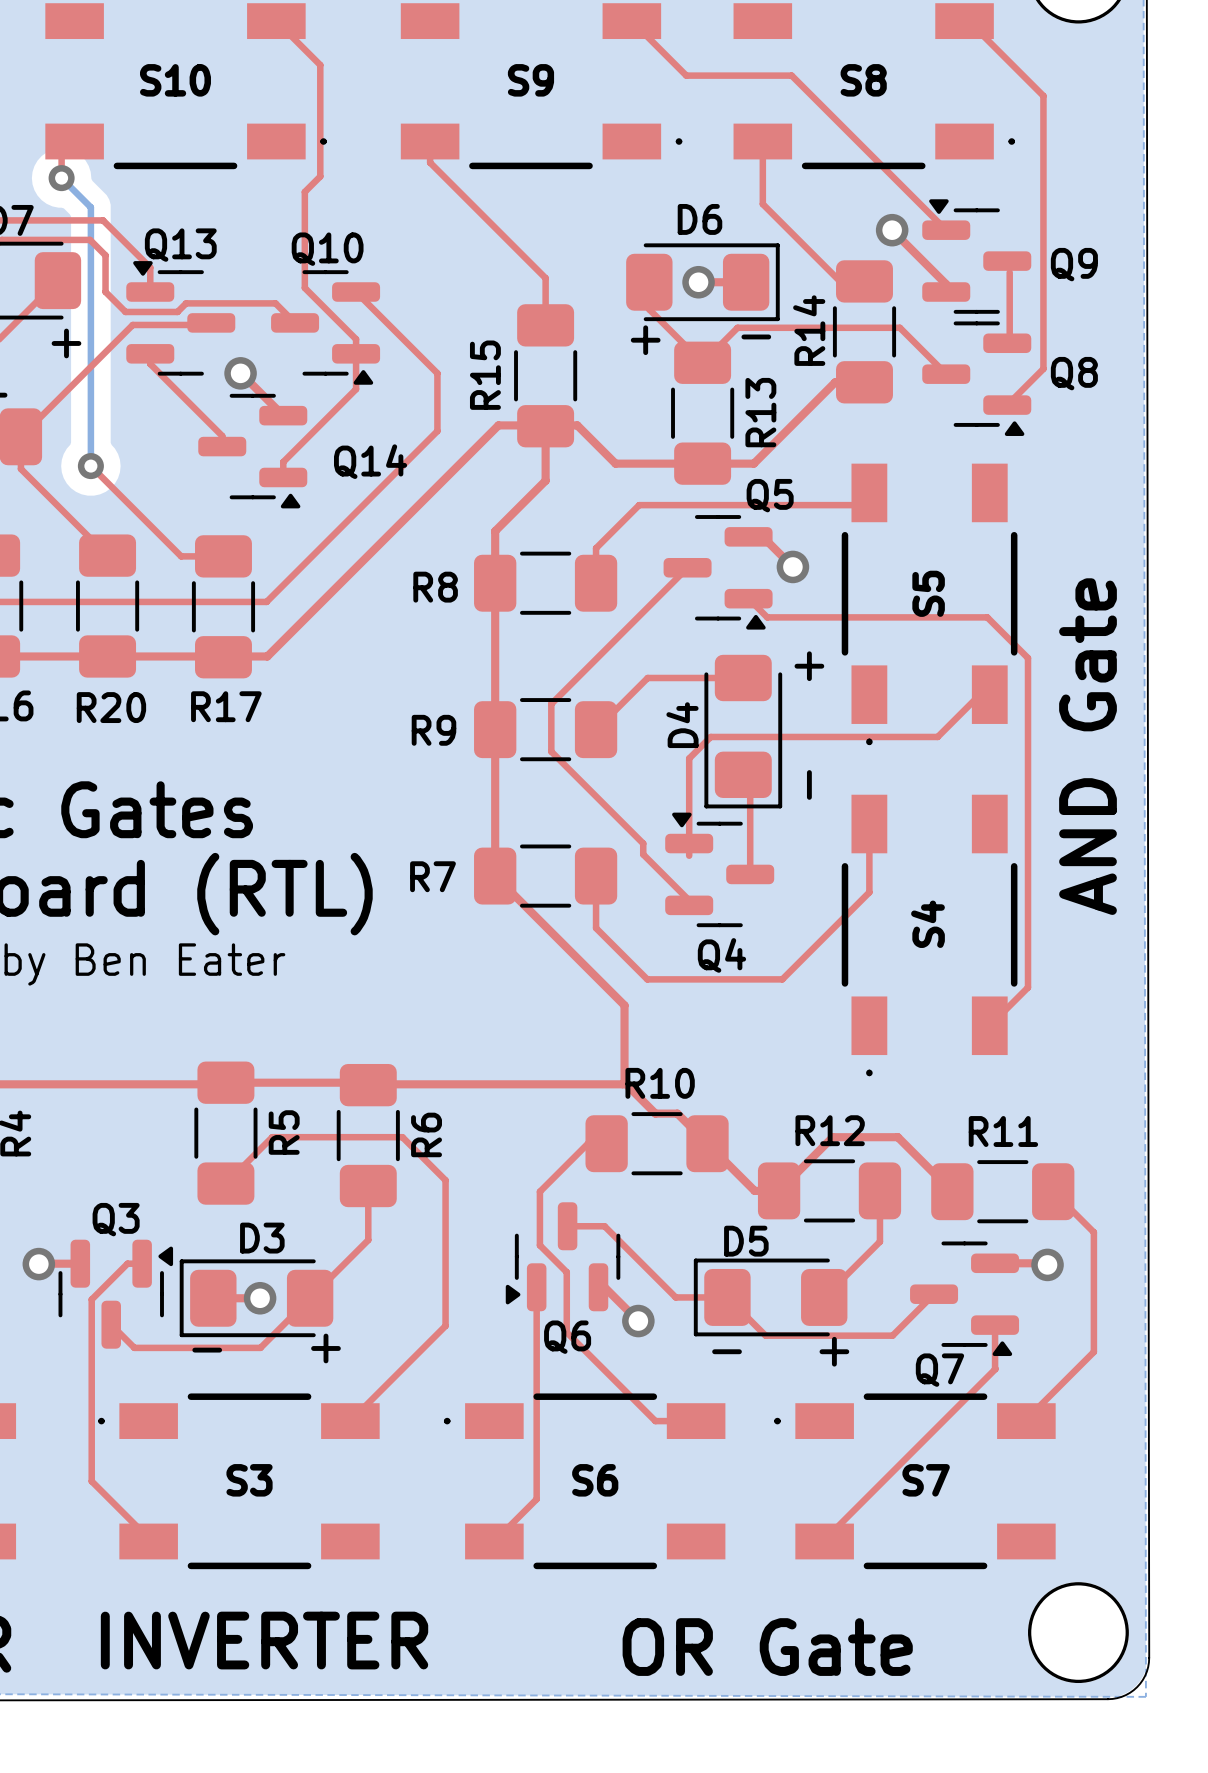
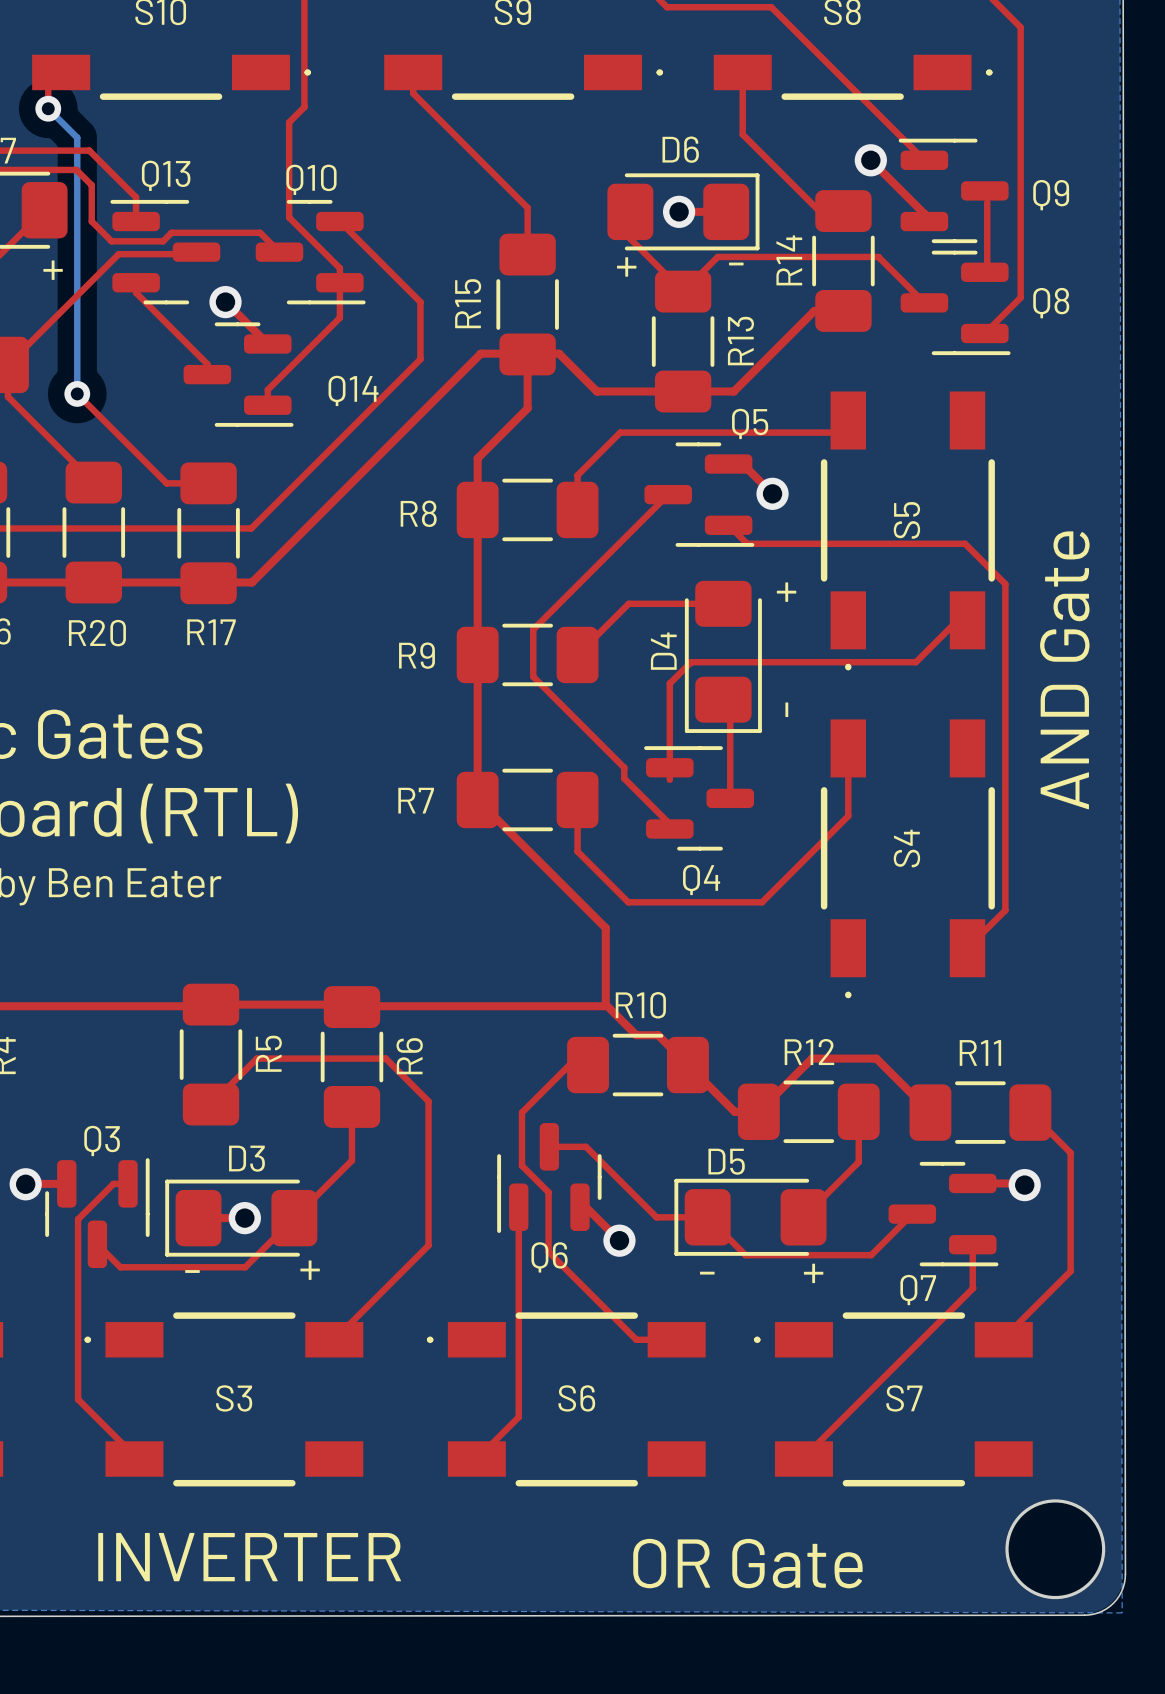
Q9 footprint: [922, 199, 1032, 314] -> [898, 138, 1009, 244]
Q13 footprint: [126, 261, 236, 376] -> [110, 199, 221, 305]
Q10 footprint: [271, 270, 381, 385] -> [255, 199, 366, 305]
Q8 footprint: [922, 321, 1032, 436] -> [900, 250, 1011, 356]
Q14 footprint: [198, 393, 308, 509] -> [183, 322, 294, 427]
Q5 footprint: [663, 515, 773, 630] -> [644, 442, 755, 547]
Q4 footprint: [665, 812, 775, 928] -> [644, 746, 755, 851]
Q6 footprint: [505, 1202, 621, 1312] -> [497, 1123, 602, 1233]
Q3 footprint: [58, 1239, 174, 1349] -> [45, 1158, 150, 1269]
Q7 footprint: [910, 1241, 1020, 1357] -> [888, 1161, 999, 1267]

